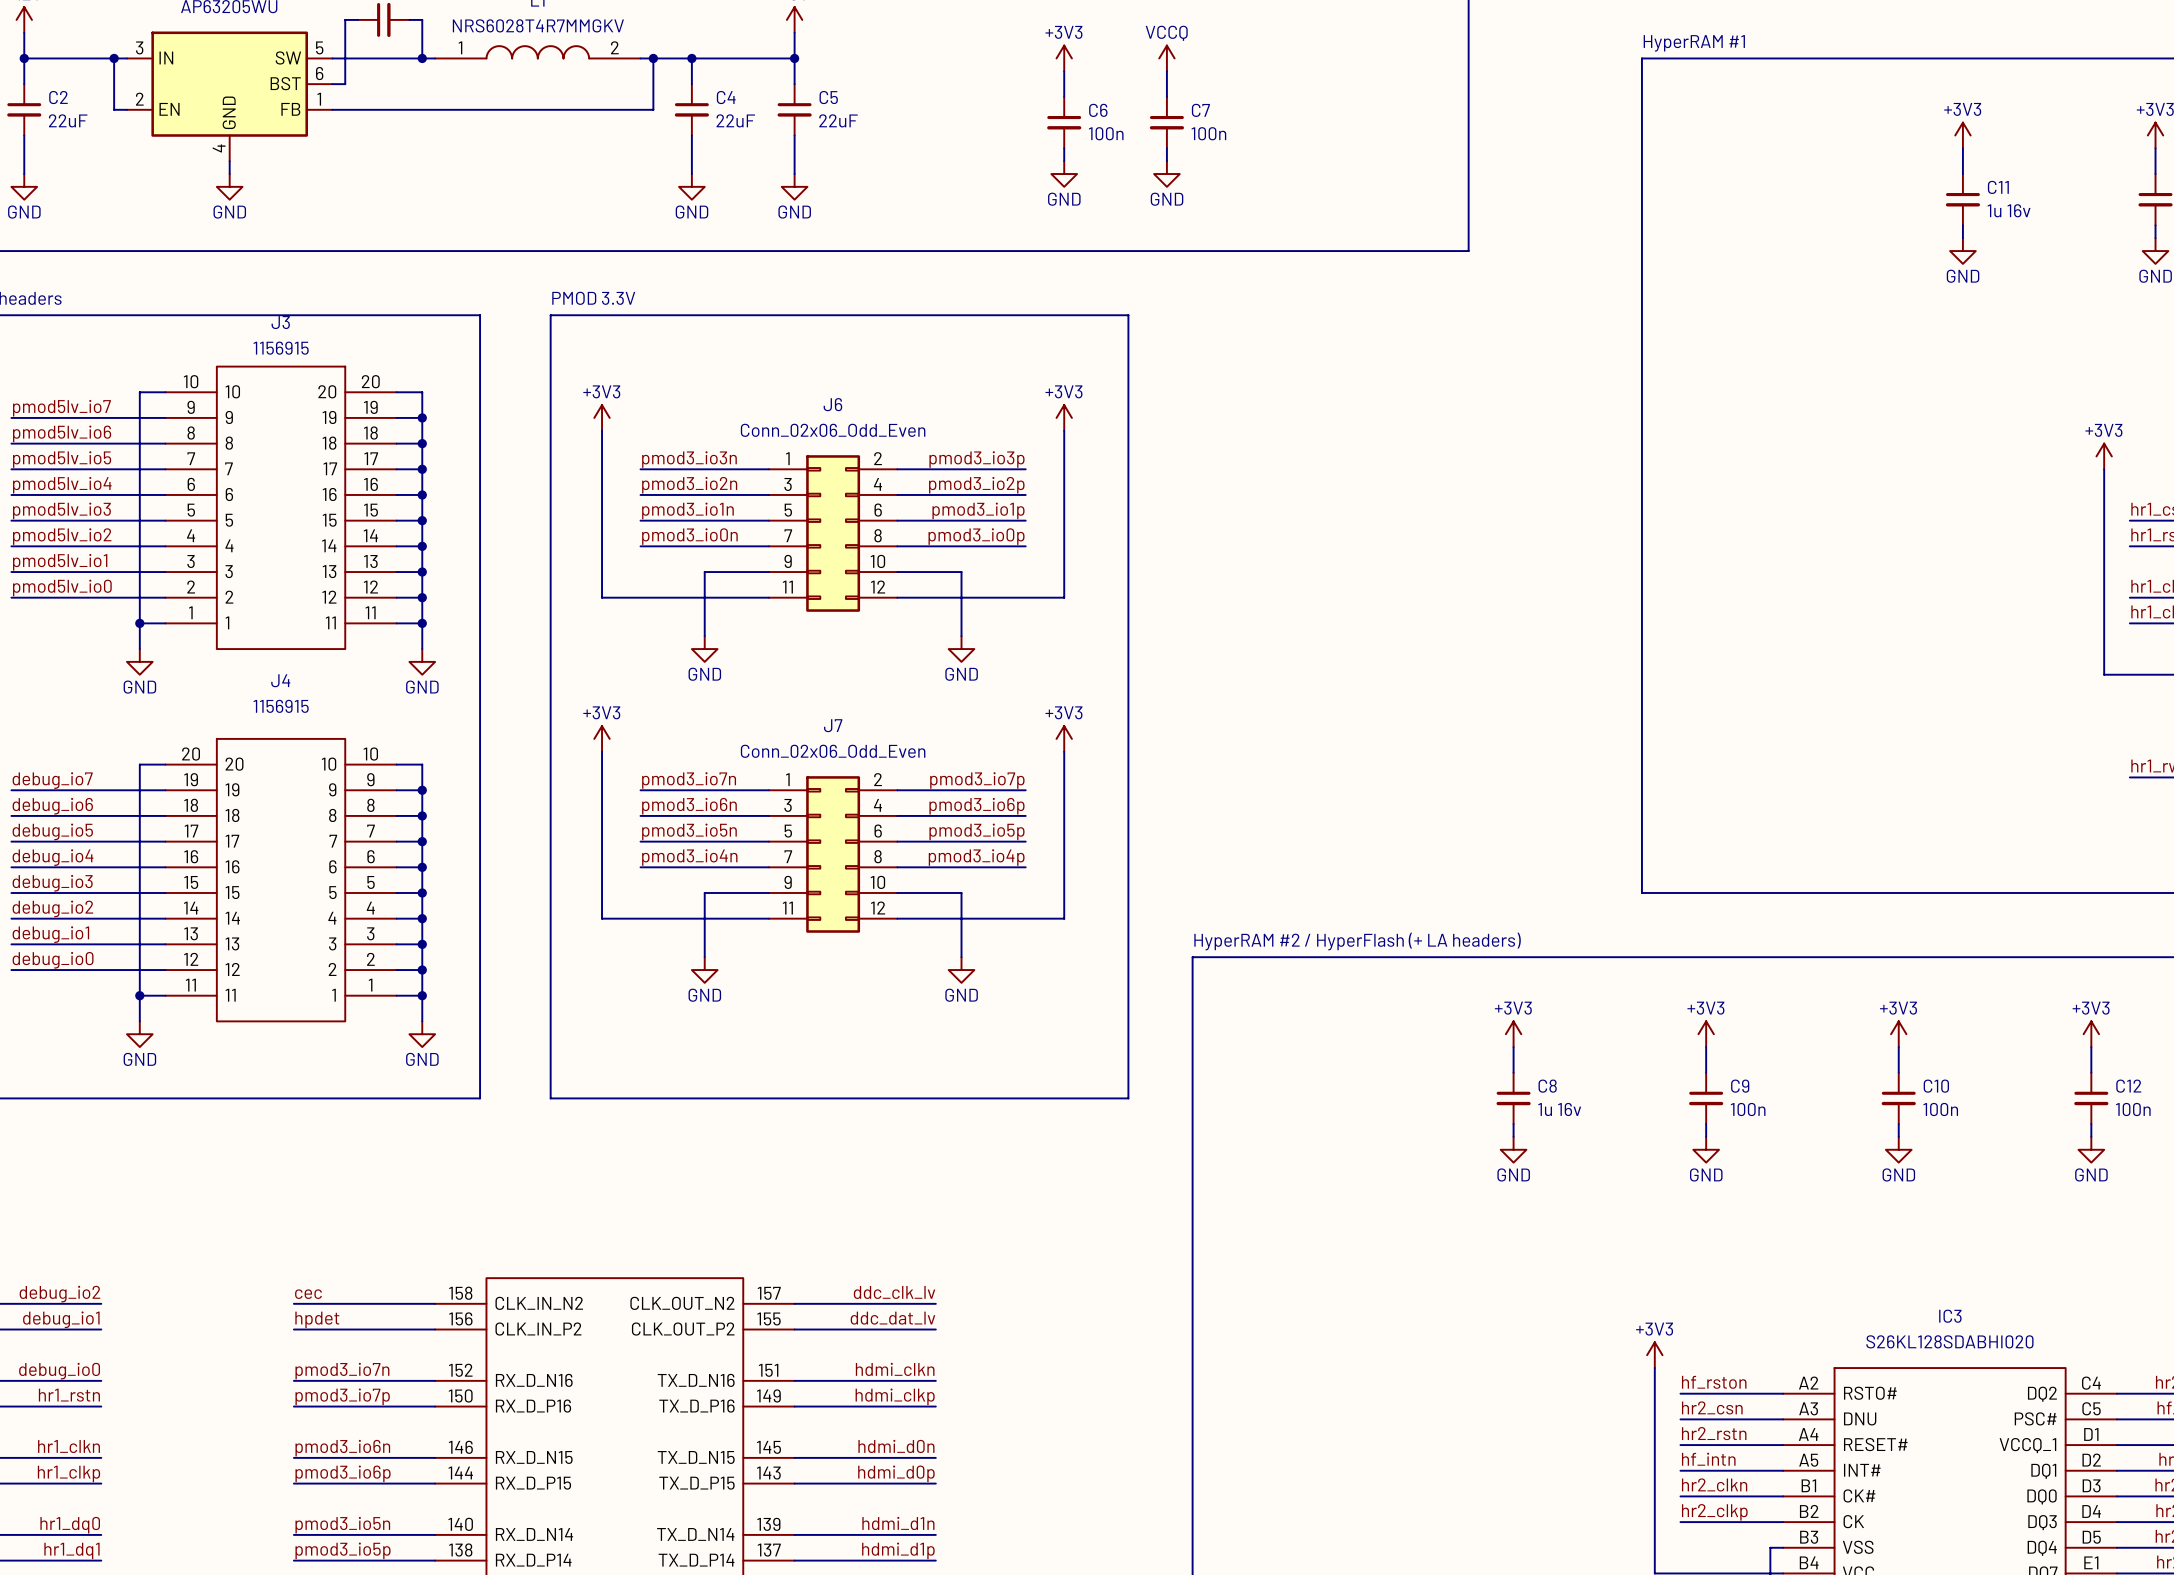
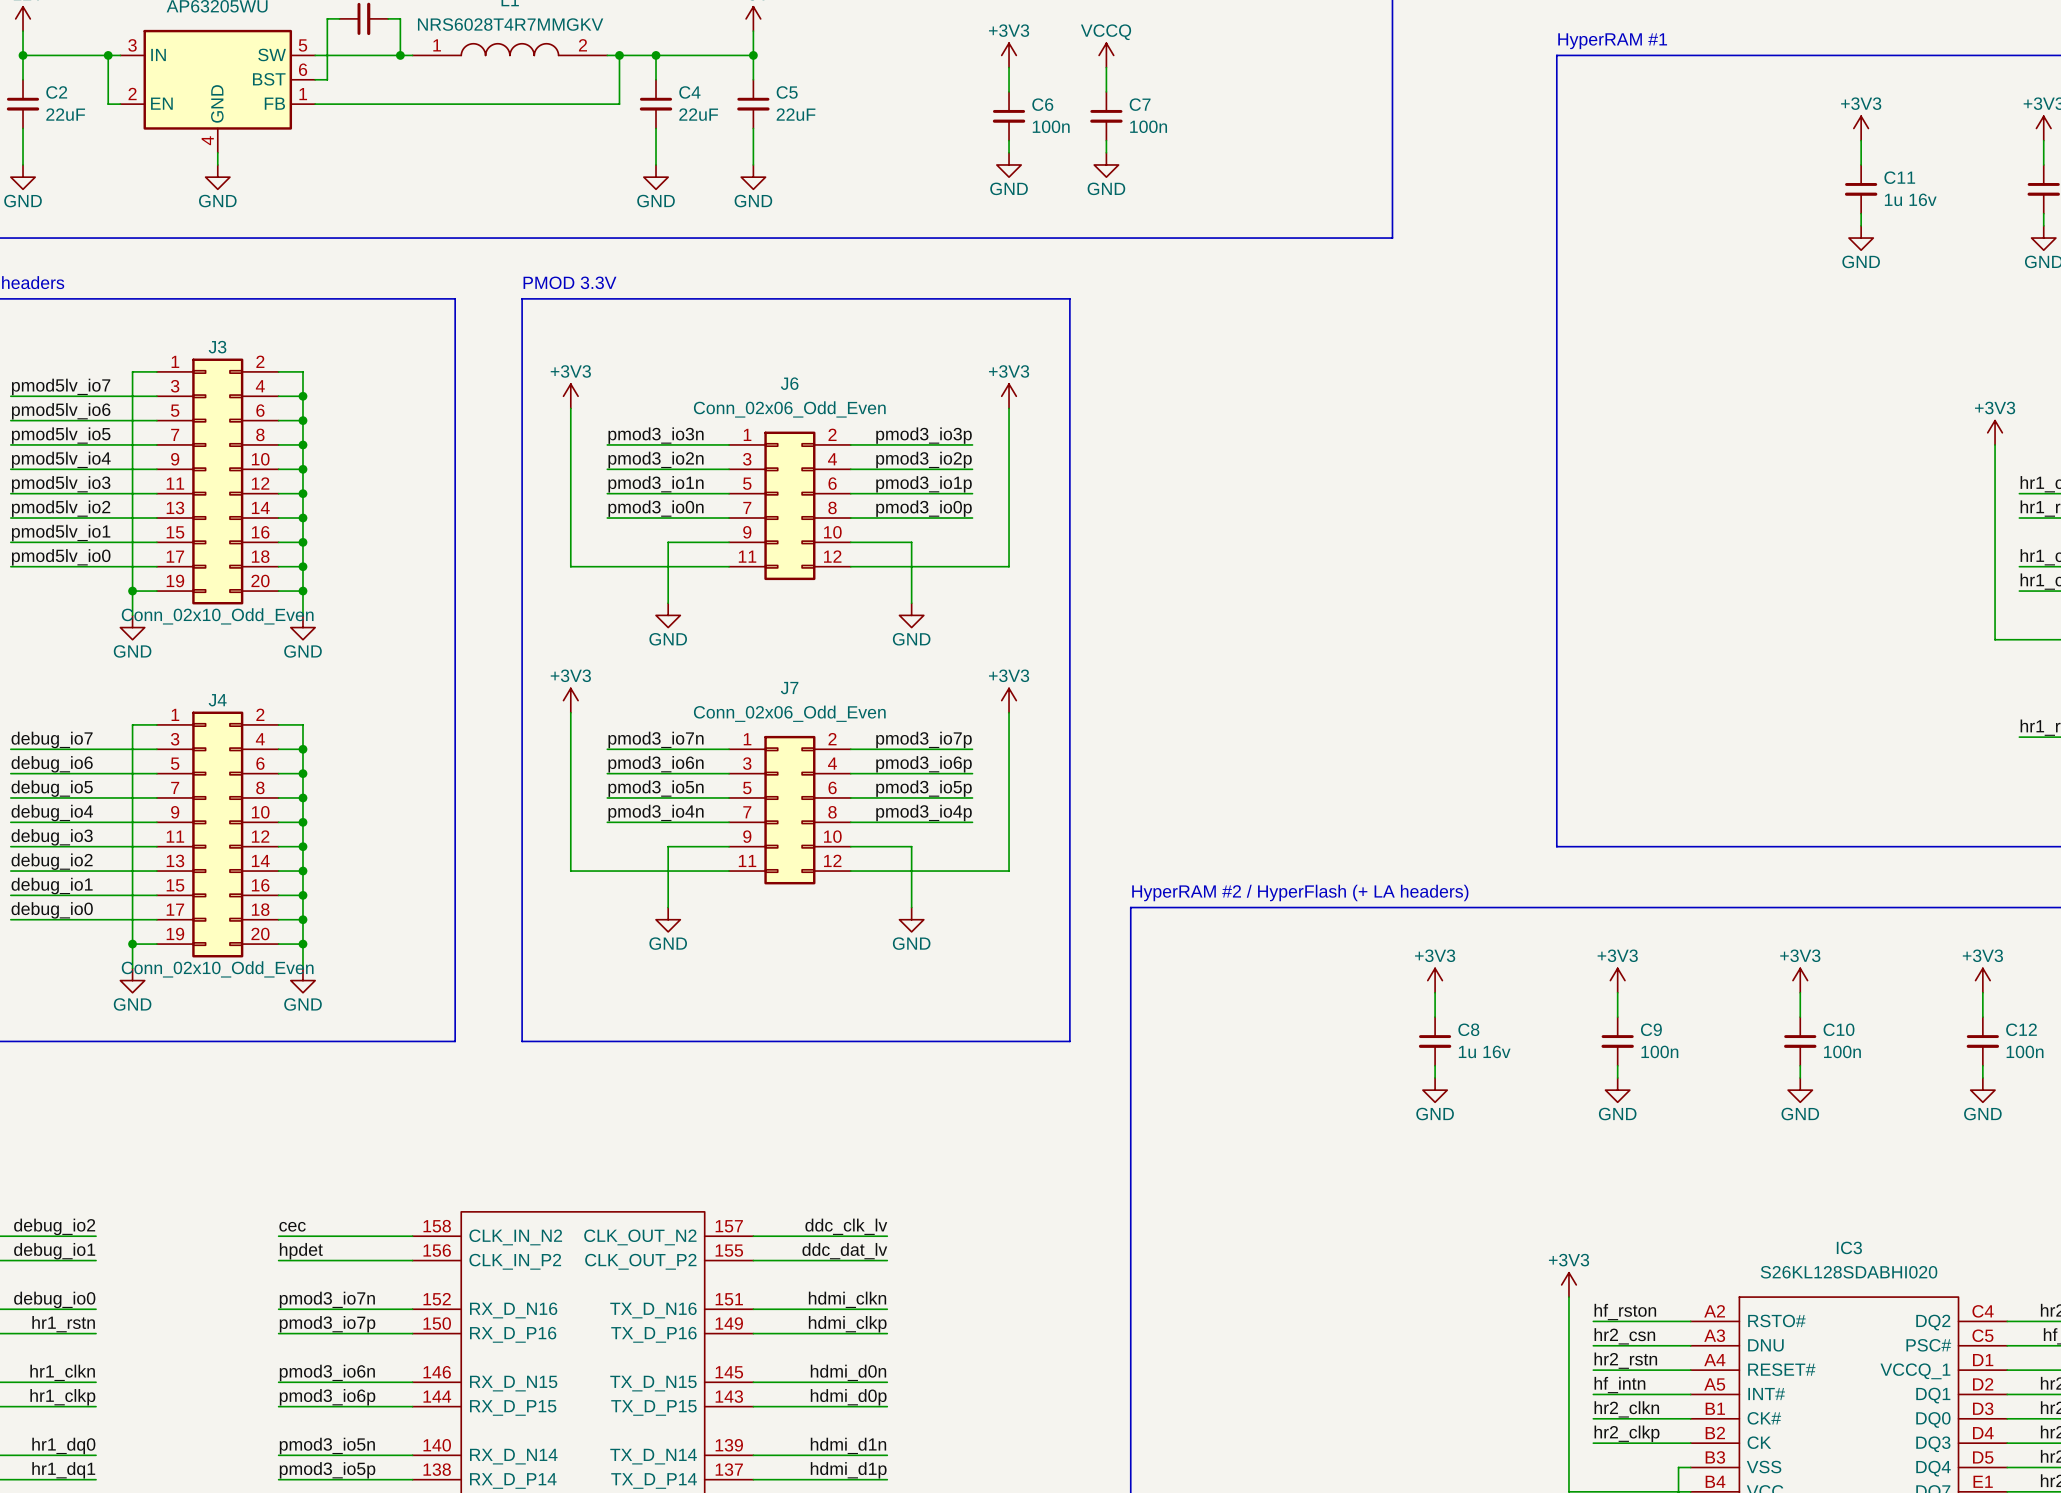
J3 name position: J3 (280, 322) -> J3 (217, 347)
J3 value: 1156915 (281, 348) -> Conn_02x10_Odd_Even (217, 616)
J3 symbol: [165, 365, 397, 650] -> [156, 358, 279, 605]
wire: (396, 392) (422, 392) (422, 649) -> (278, 371) (302, 371) (302, 615)
junction: none -> (302, 396)
wire: (396, 417) (422, 417) -> (278, 396) (302, 396)
junction: (422, 417) -> none
junction: none -> (302, 420)
wire: (396, 443) (422, 443) -> (278, 420) (302, 420)
junction: (422, 443) -> none
junction: none -> (302, 444)
wire: (396, 469) (422, 469) -> (278, 444) (302, 444)
junction: (422, 469) -> none
junction: none -> (302, 469)
wire: (396, 494) (422, 494) -> (278, 469) (302, 469)
junction: (422, 494) -> none
junction: none -> (302, 493)
wire: (396, 520) (422, 520) -> (278, 493) (302, 493)
junction: (422, 520) -> none
junction: none -> (302, 518)
wire: (396, 546) (422, 546) -> (278, 518) (302, 518)
junction: (422, 546) -> none
junction: none -> (302, 542)
wire: (396, 572) (422, 572) -> (278, 542) (302, 542)
junction: (422, 572) -> none
junction: none -> (302, 566)
wire: (396, 597) (422, 597) -> (278, 566) (302, 566)
junction: (422, 597) -> none
junction: none -> (302, 591)
wire: (396, 623) (422, 623) -> (278, 591) (302, 591)
junction: (422, 623) -> none
power symbol position: GND (422, 661) -> GND (302, 627)
J4 name position: J4 (280, 680) -> J4 (217, 700)
J4 value: 1156915 (281, 706) -> Conn_02x10_Odd_Even (217, 969)
J4 symbol: [165, 738, 397, 1023] -> [156, 711, 279, 958]
wire: (396, 764) (422, 764) (422, 1021) -> (278, 724) (302, 724) (302, 968)
junction: none -> (302, 749)
wire: (396, 790) (422, 790) -> (278, 749) (302, 749)
junction: (422, 790) -> none
junction: none -> (302, 773)
wire: (396, 815) (422, 815) -> (278, 773) (302, 773)
junction: (422, 815) -> none
junction: none -> (302, 797)
wire: (396, 841) (422, 841) -> (278, 797) (302, 797)
junction: (422, 841) -> none
junction: none -> (302, 822)
wire: (396, 867) (422, 867) -> (278, 822) (302, 822)
junction: (422, 867) -> none
junction: none -> (302, 846)
wire: (396, 892) (422, 892) -> (278, 846) (302, 846)
junction: (422, 892) -> none
junction: none -> (302, 871)
wire: (396, 918) (422, 918) -> (278, 871) (302, 871)
junction: (422, 918) -> none
junction: none -> (302, 895)
wire: (396, 944) (422, 944) -> (278, 895) (302, 895)
junction: (422, 944) -> none
junction: none -> (302, 919)
wire: (396, 970) (422, 970) -> (278, 919) (302, 919)
junction: (422, 970) -> none
junction: none -> (302, 944)
wire: (396, 995) (422, 995) -> (278, 944) (302, 944)
junction: (422, 995) -> none
power symbol position: GND (422, 1034) -> GND (302, 980)

